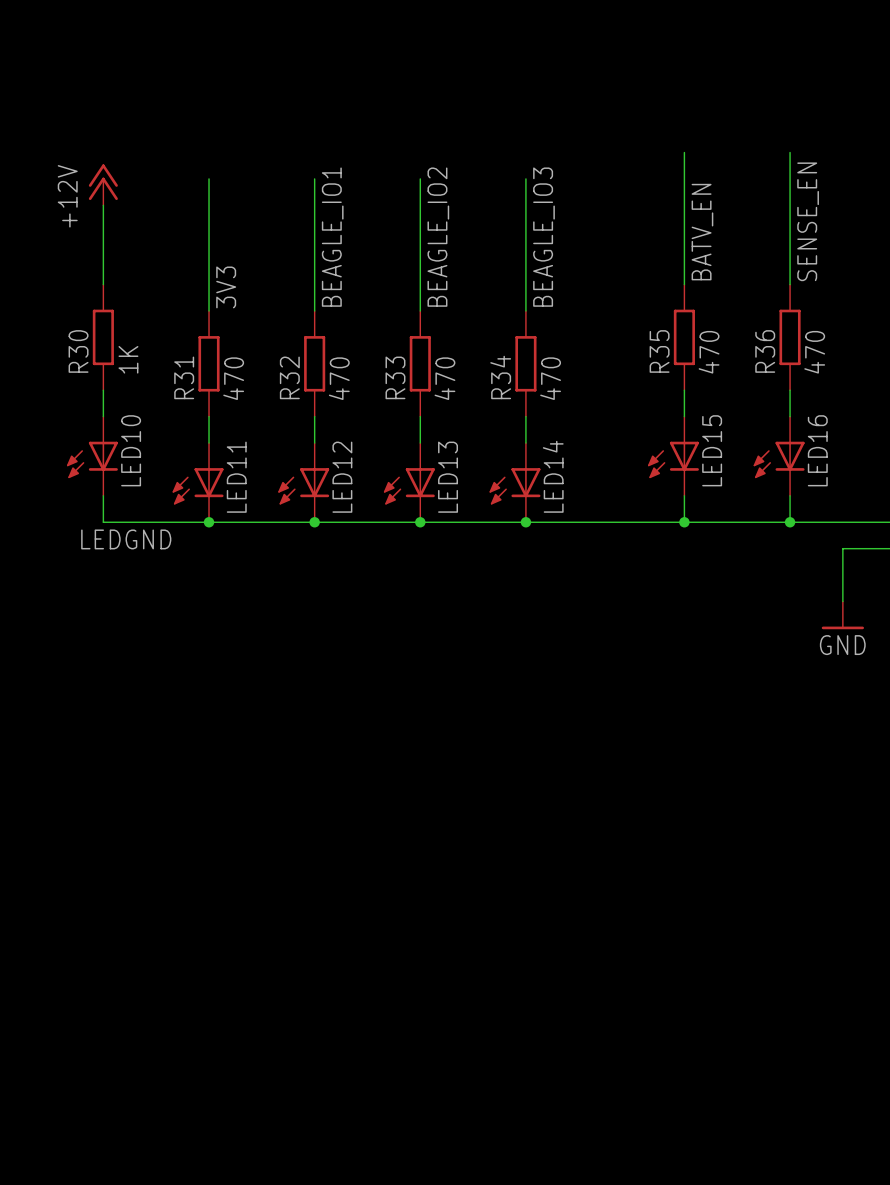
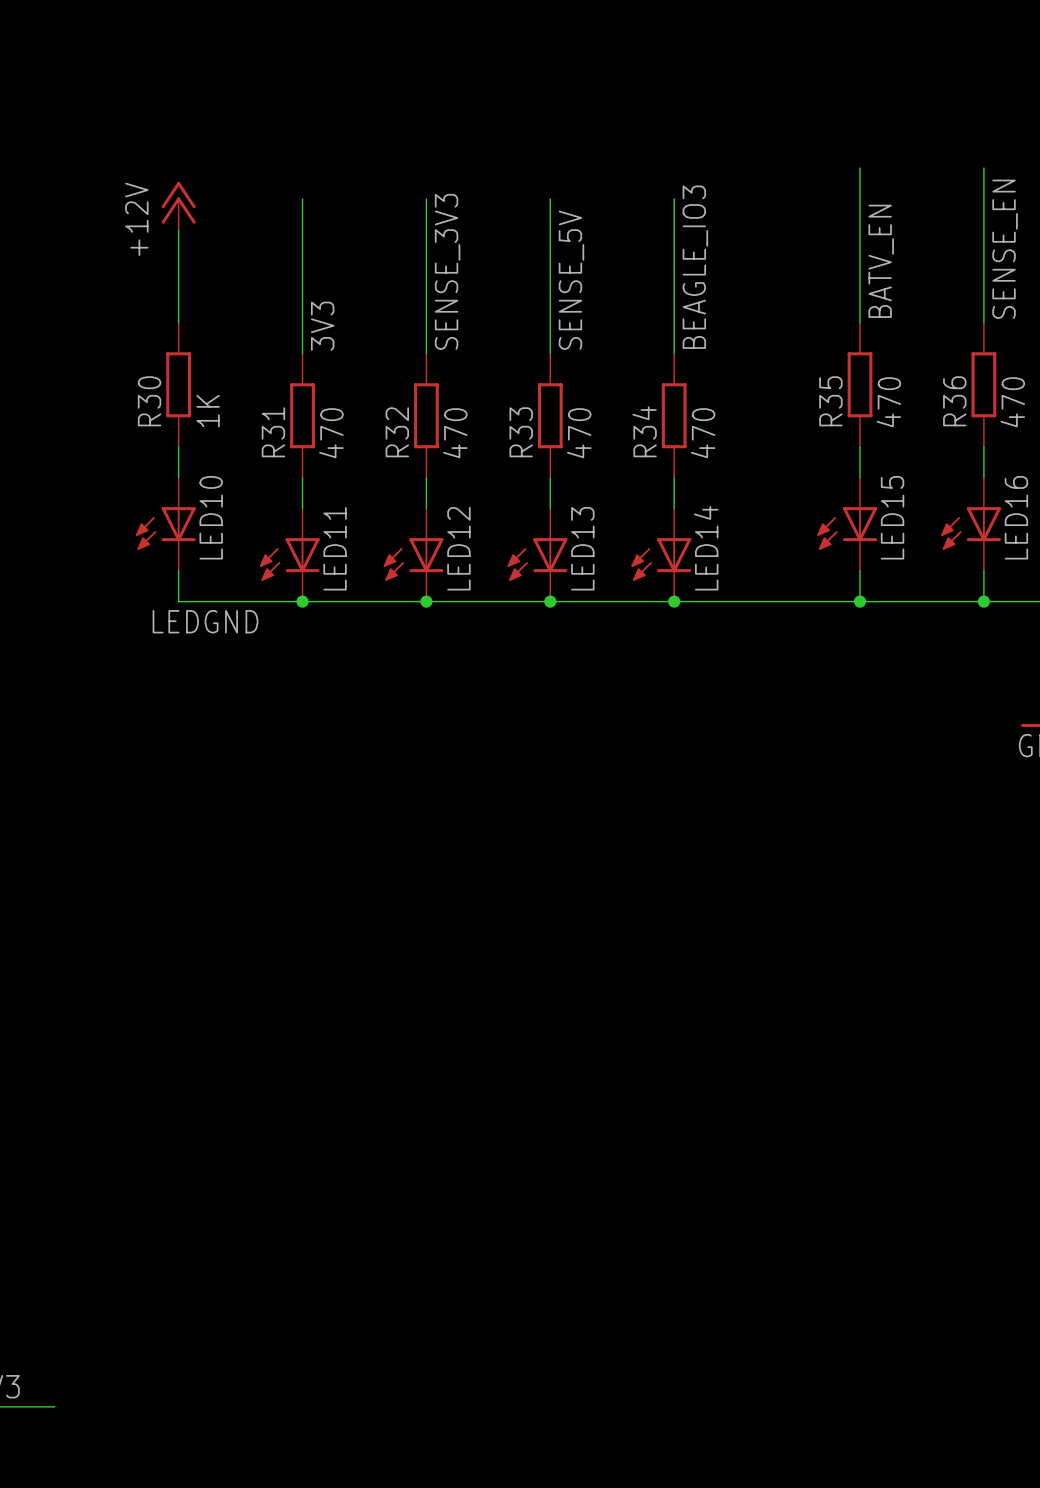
label: BEAGLE_IO1 (332, 237) -> SENSE_3V3 (447, 271)
label: BEAGLE_IO2 (438, 237) -> SENSE_5V (571, 280)

